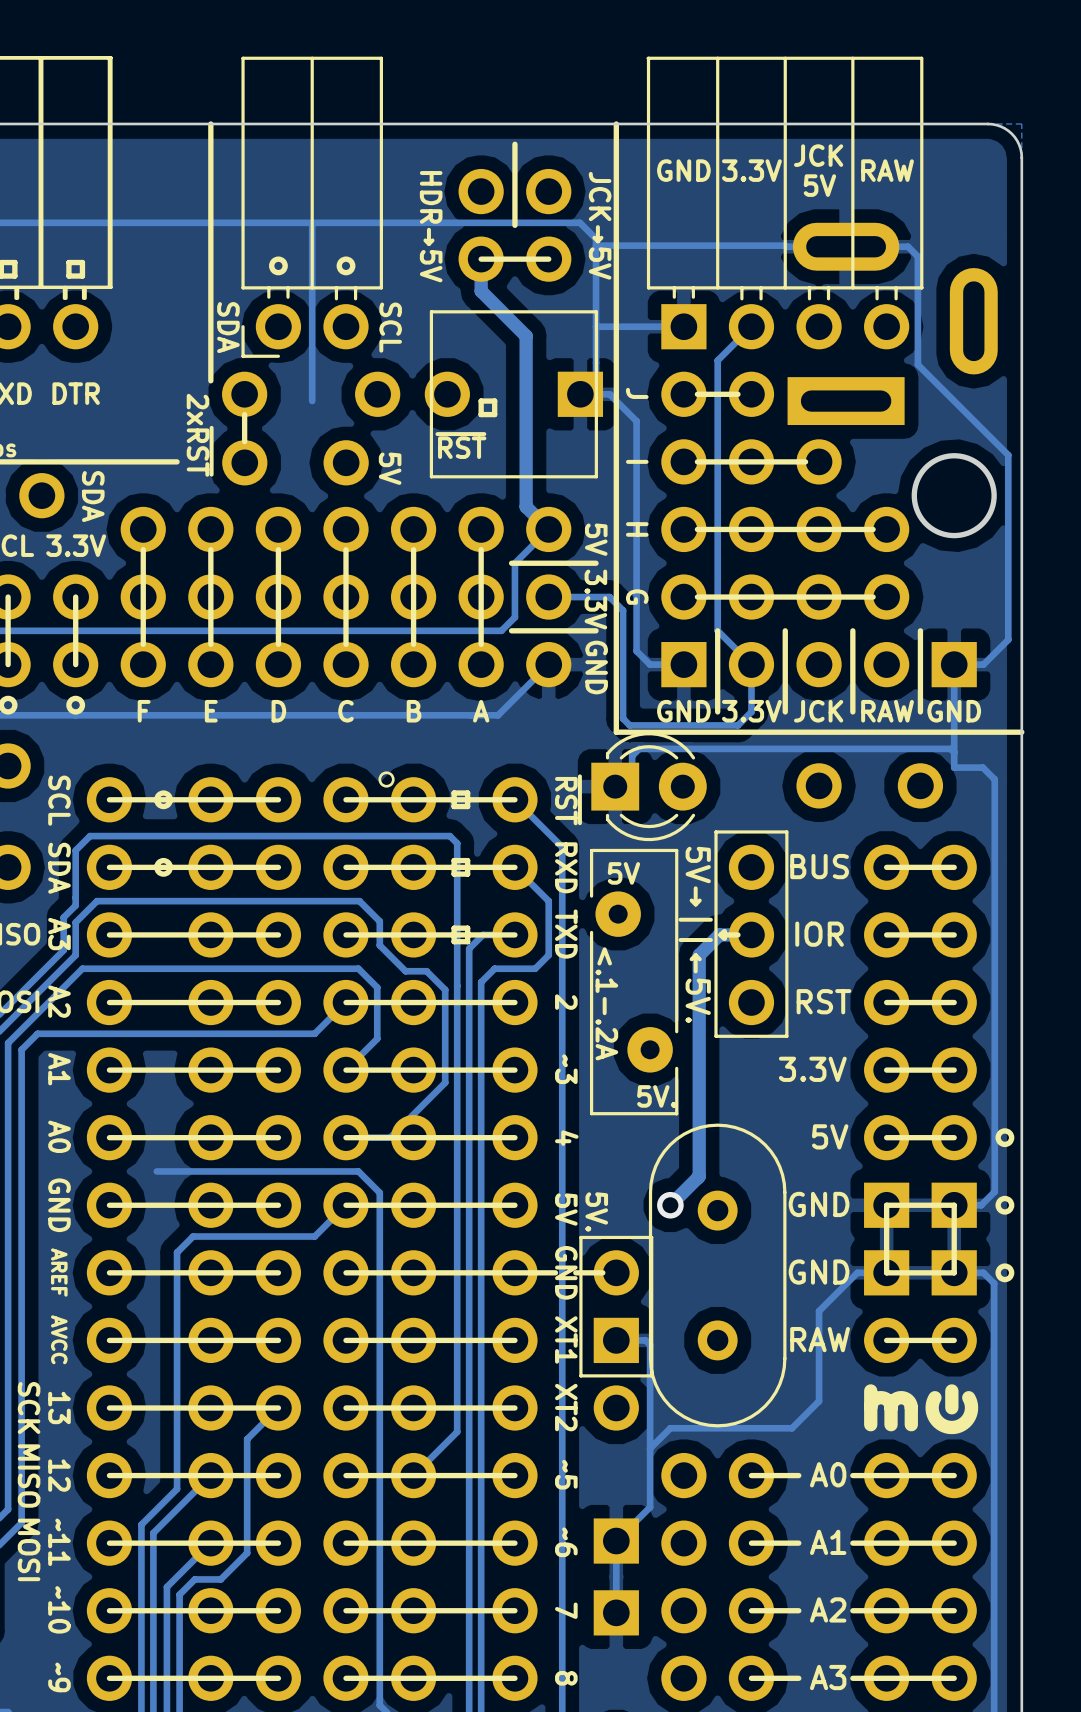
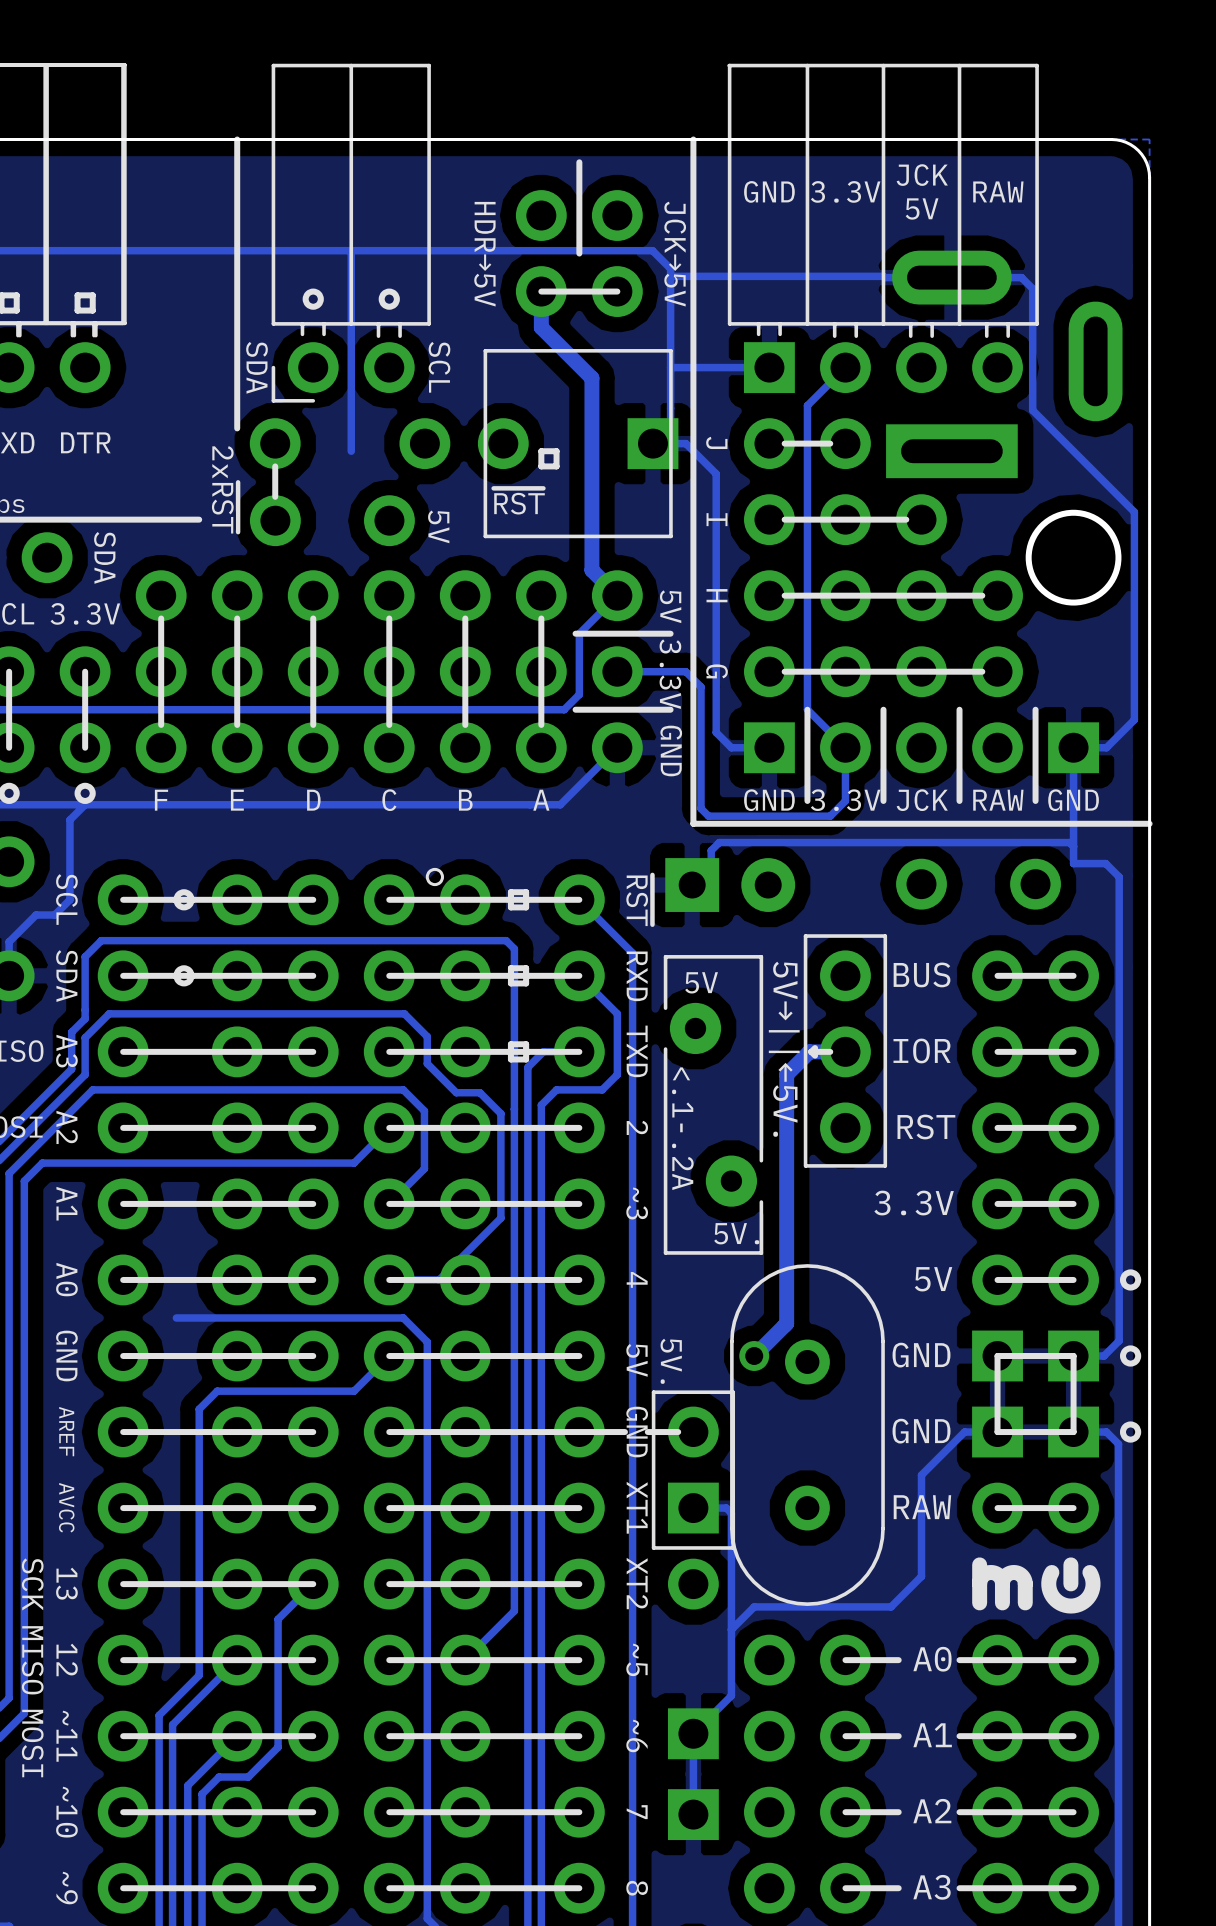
track: none -> (85, 804) (69, 819) (69, 899) (54, 915) (36, 915) (9, 941) (9, 975)
part footprint: [591, 732, 707, 842] -> [665, 858, 796, 912]

